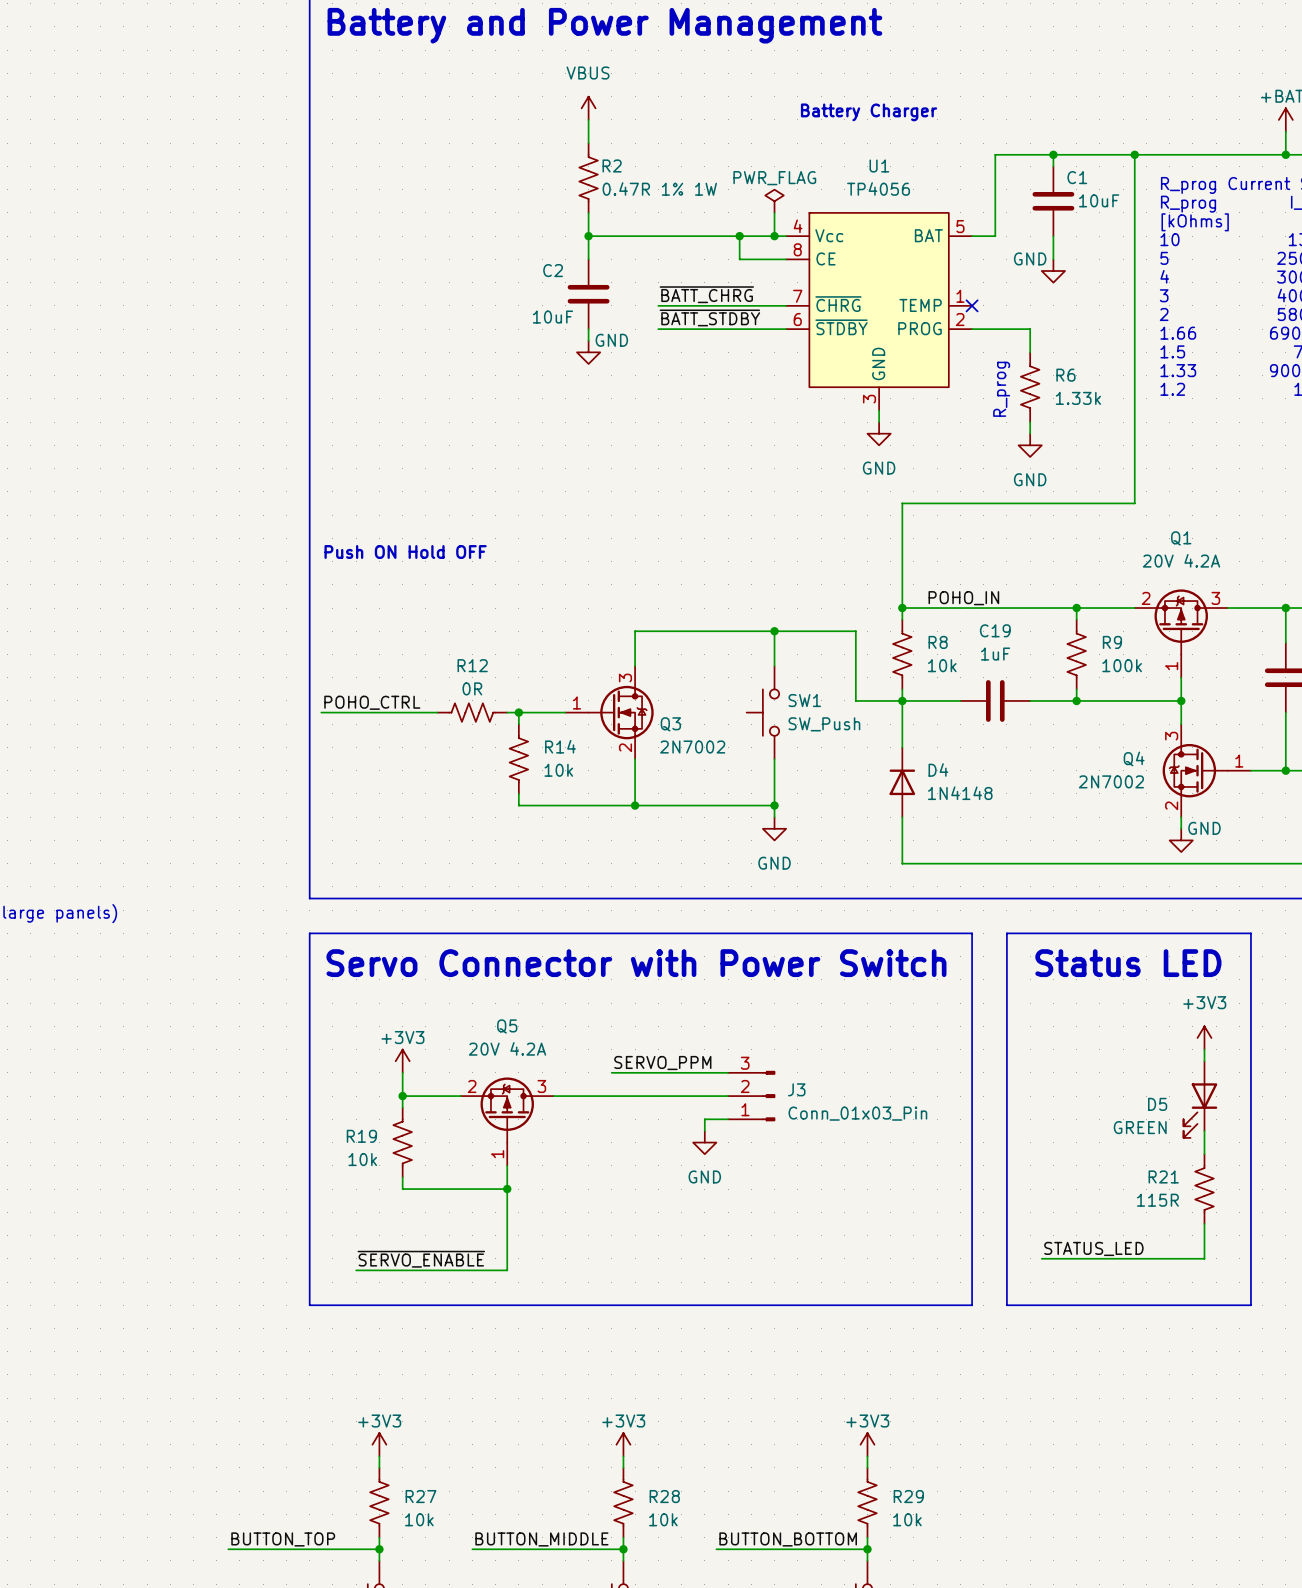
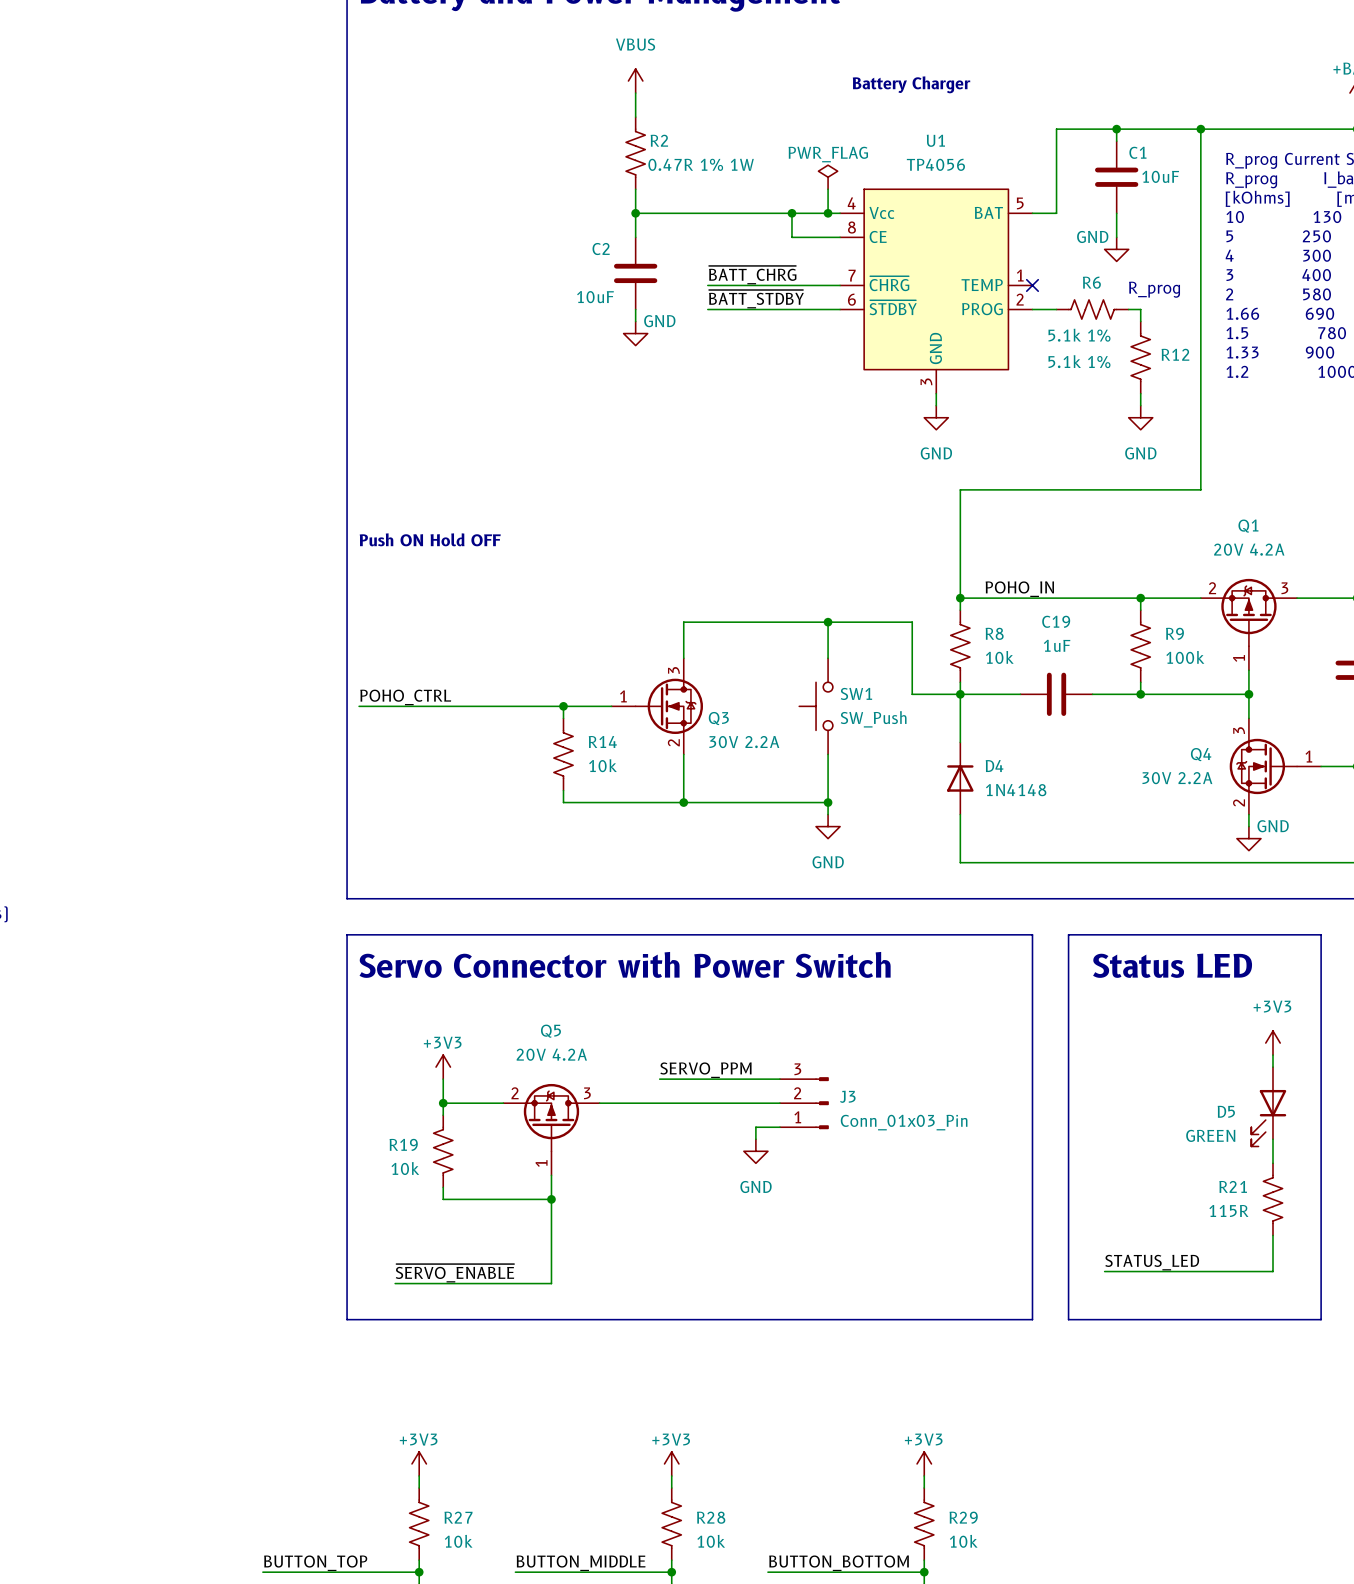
wire: (995, 329) (1030, 329) (1030, 352) -> none
wire: none -> (1128, 309) (1140, 309) (1140, 321)
R6 name position: R6 (1065, 375) -> R6 (1091, 282)
R6 rotation: 0° (1030, 387) -> 90° clockwise (1092, 309)
R6 position: (1030, 387) -> (1092, 309)
text rotation: 0° (1001, 389) -> 90° clockwise (1154, 289)
text position: R_prog (1001, 389) -> R_prog (1154, 289)
R6 value: 1.33k (1078, 398) -> 5.1k 1% (1079, 335)
wire: (1030, 422) (1030, 433) -> (1140, 393) (1140, 405)
power symbol position: GND (1030, 445) -> GND (1140, 417)
R12 value: 0R (472, 688) -> 5.1k 1% (1079, 361)
R12 rotation: 0° (472, 712) -> 90° clockwise (1140, 357)
R12 position: (472, 712) -> (1140, 357)
Q3 value: 2N7002 (692, 747) -> 30V 2.2A (744, 742)
Q4 value: 2N7002 (1111, 781) -> 30V 2.2A (1177, 778)

